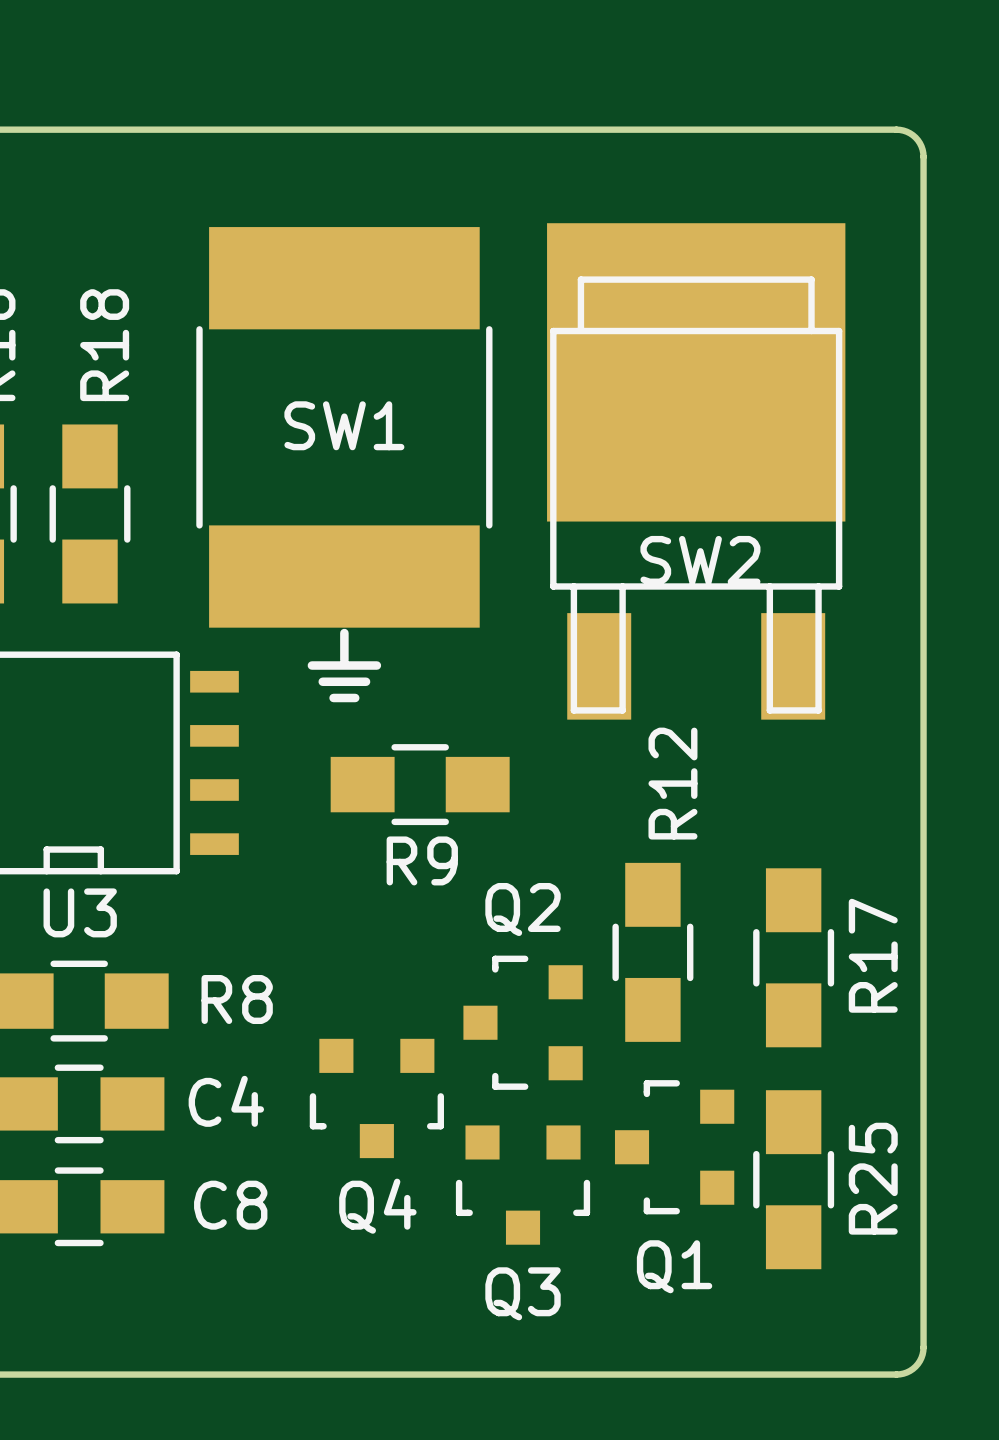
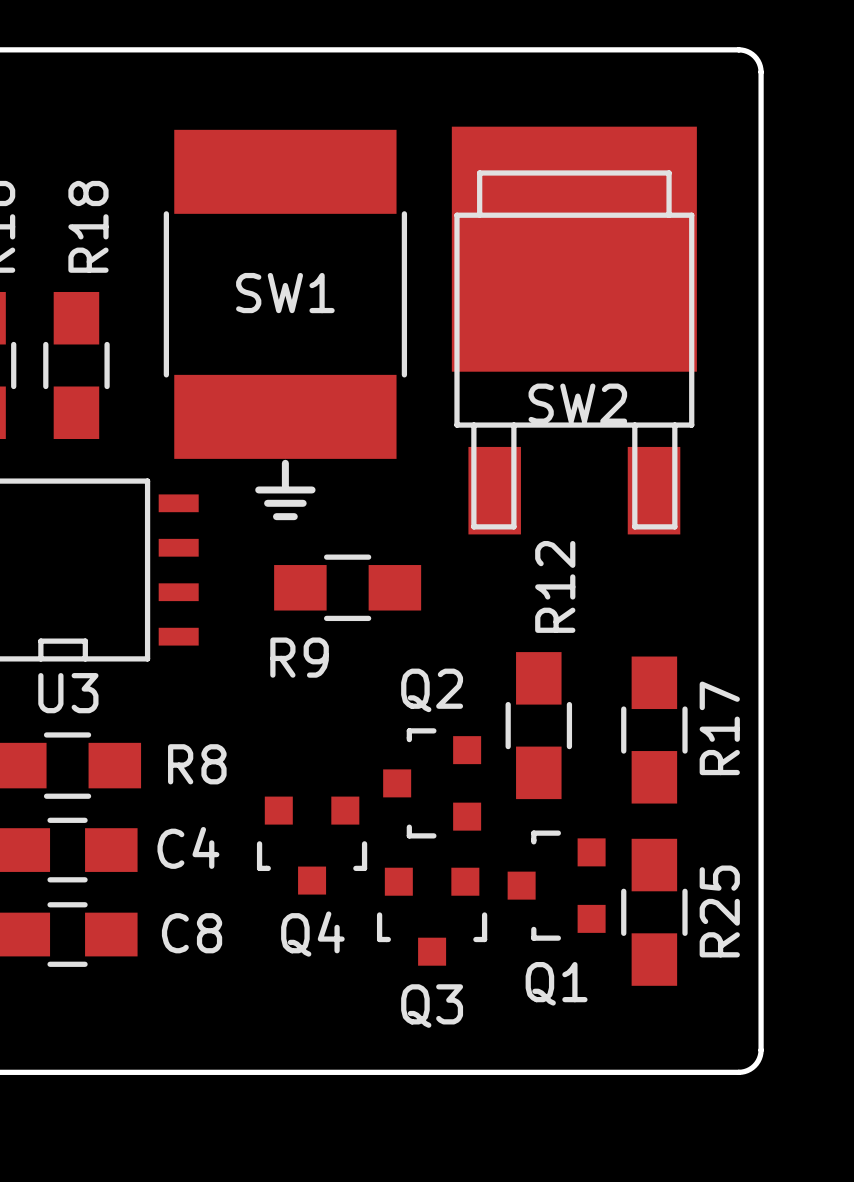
R9 name position: R9 (422, 860) -> R9 (299, 657)

